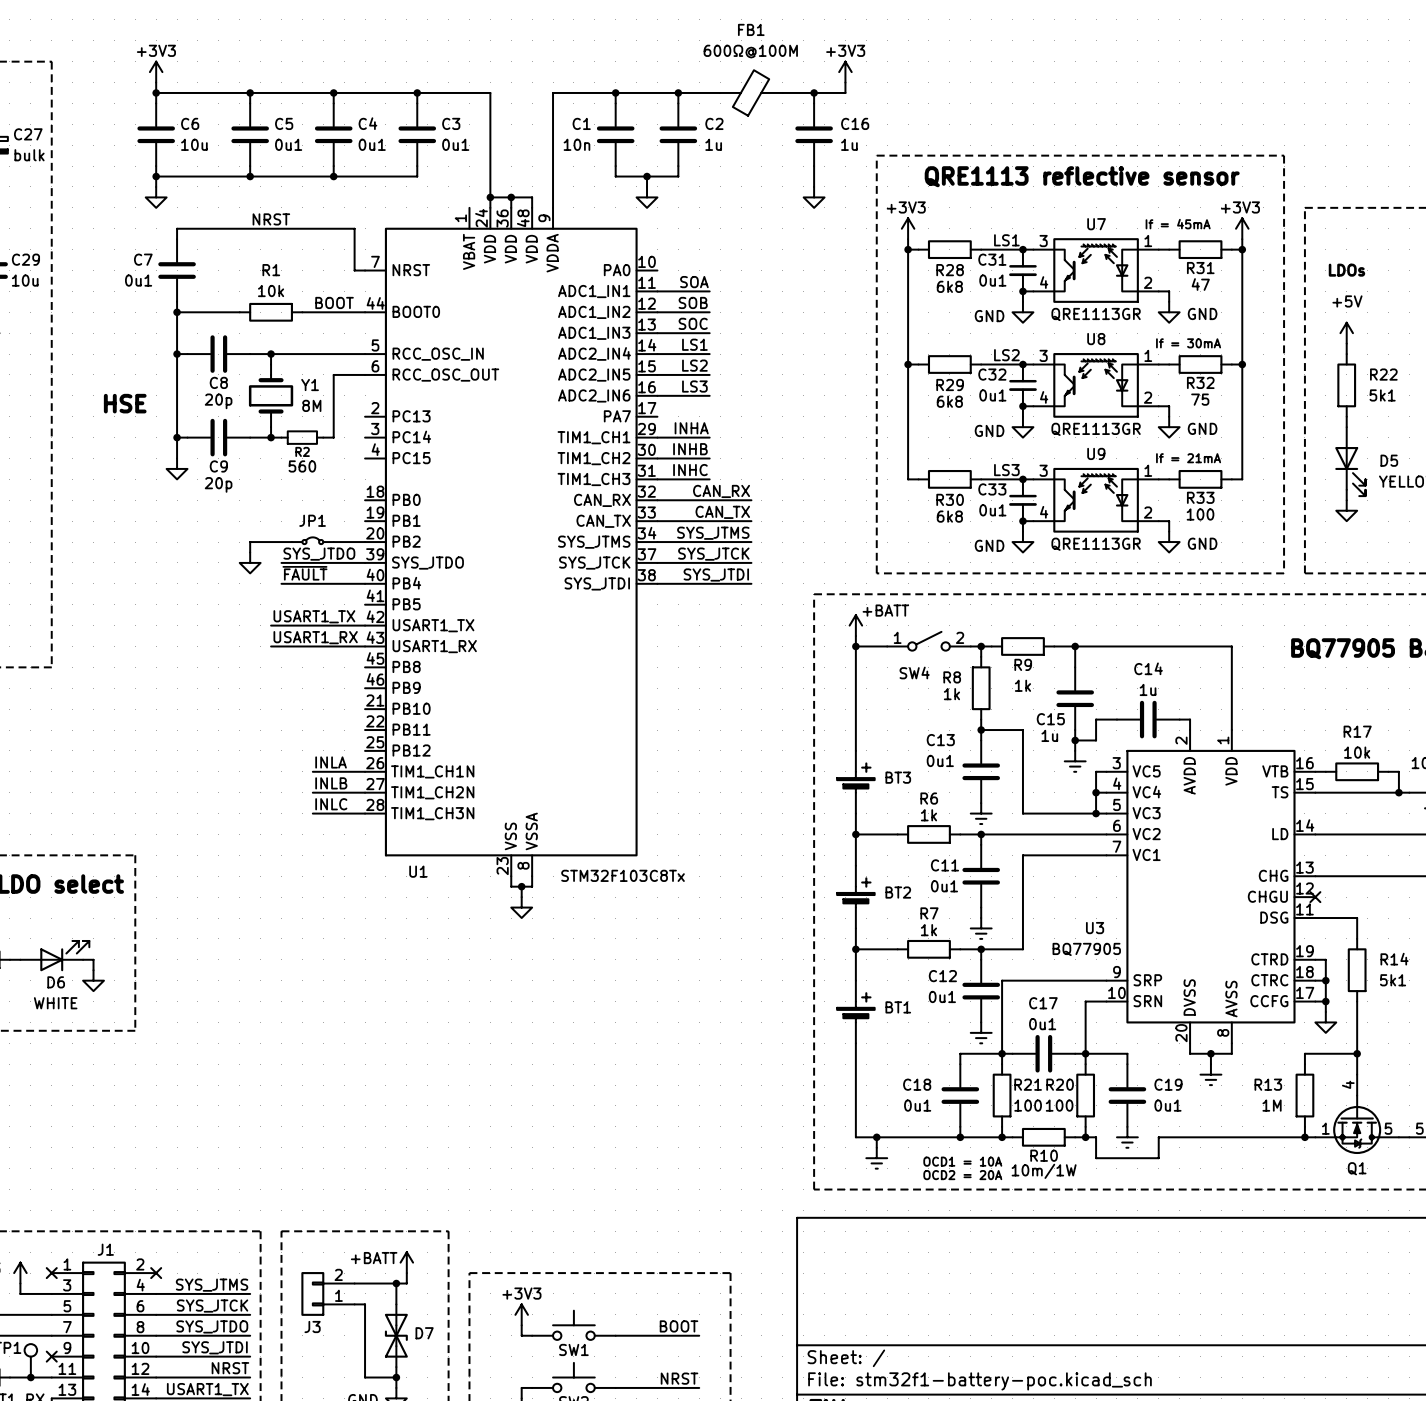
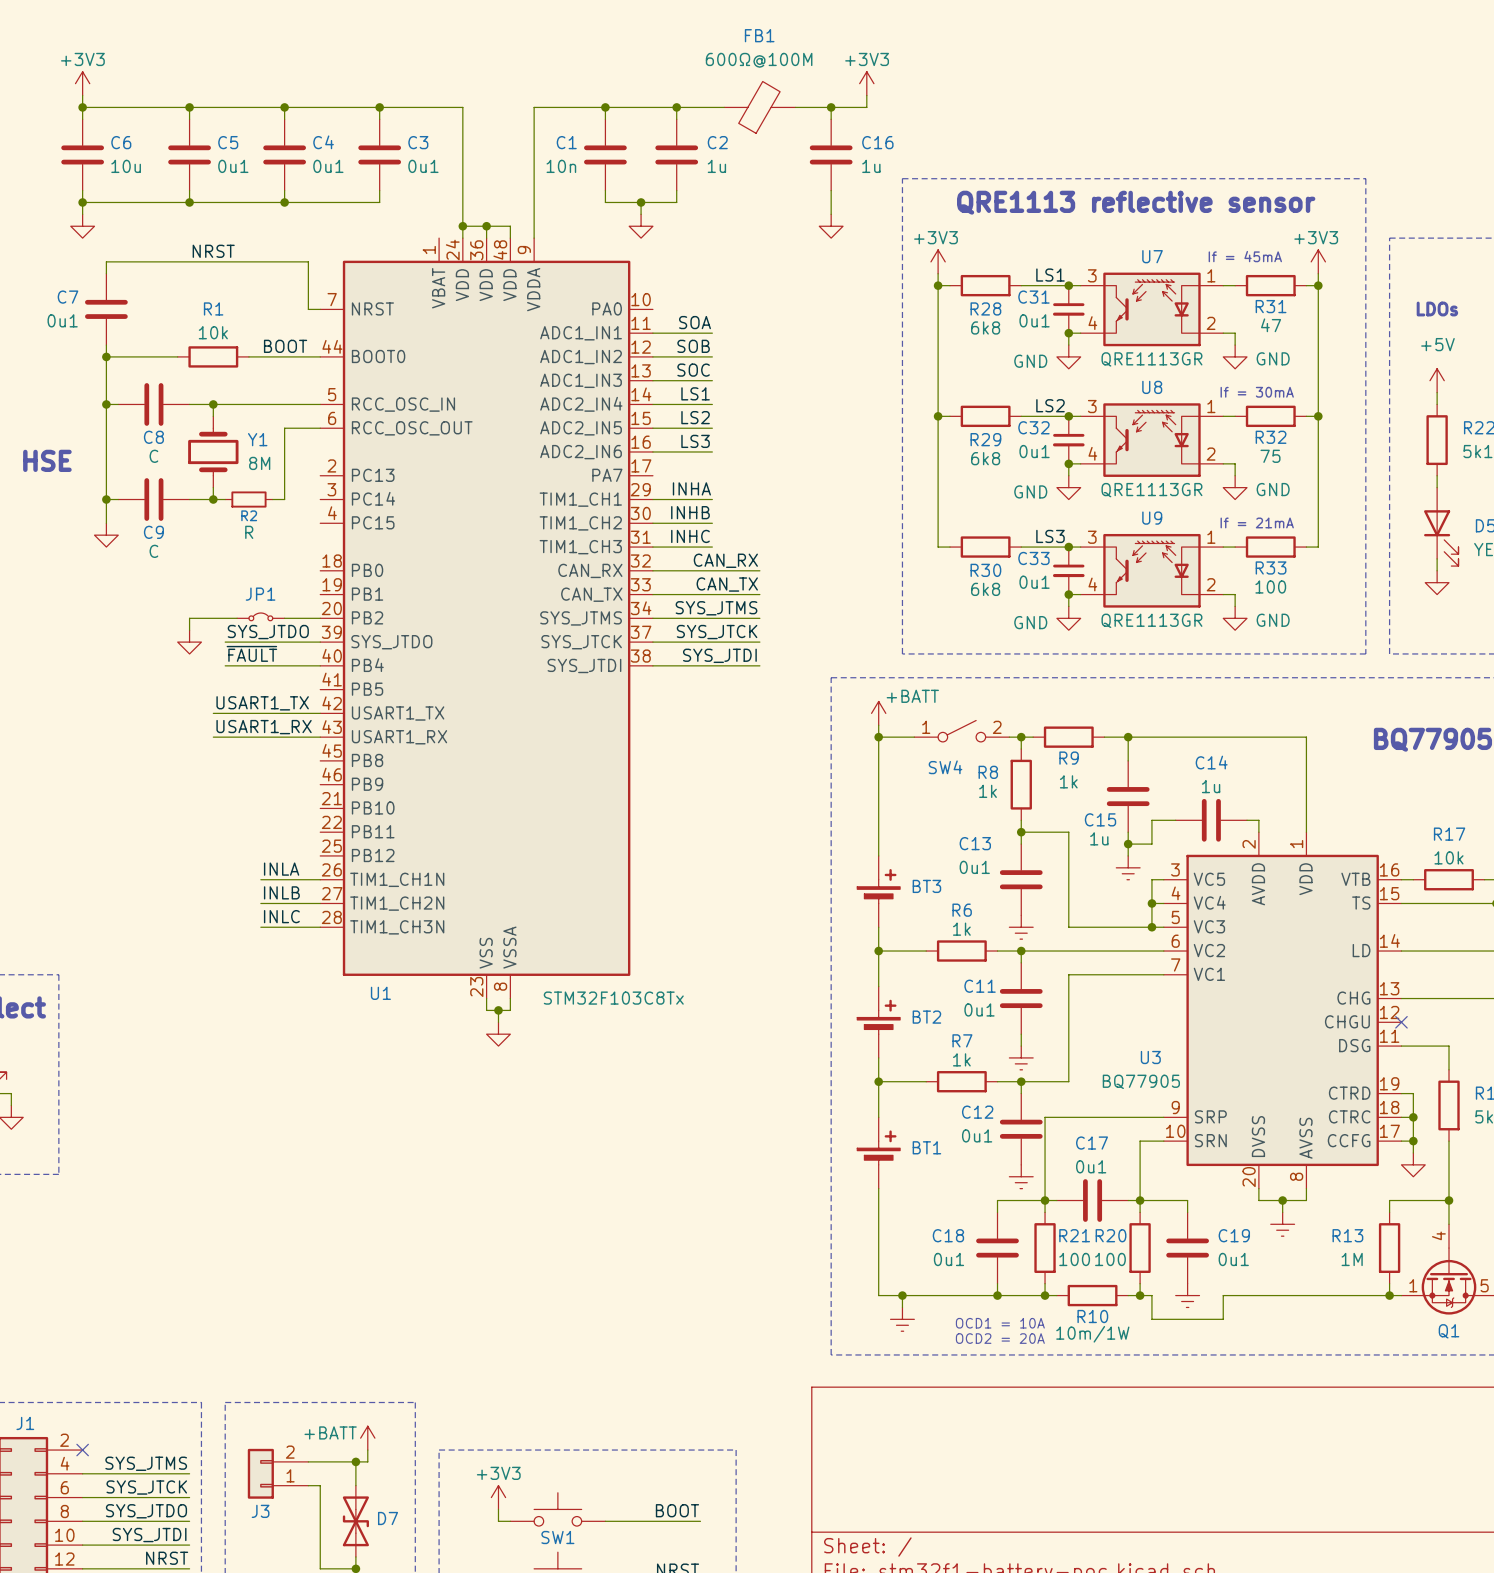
C8 value: 20p (218, 401) -> C (153, 456)
R2 value: 560 (302, 466) -> R (249, 532)
C9 value: 20p (218, 484) -> C (153, 551)

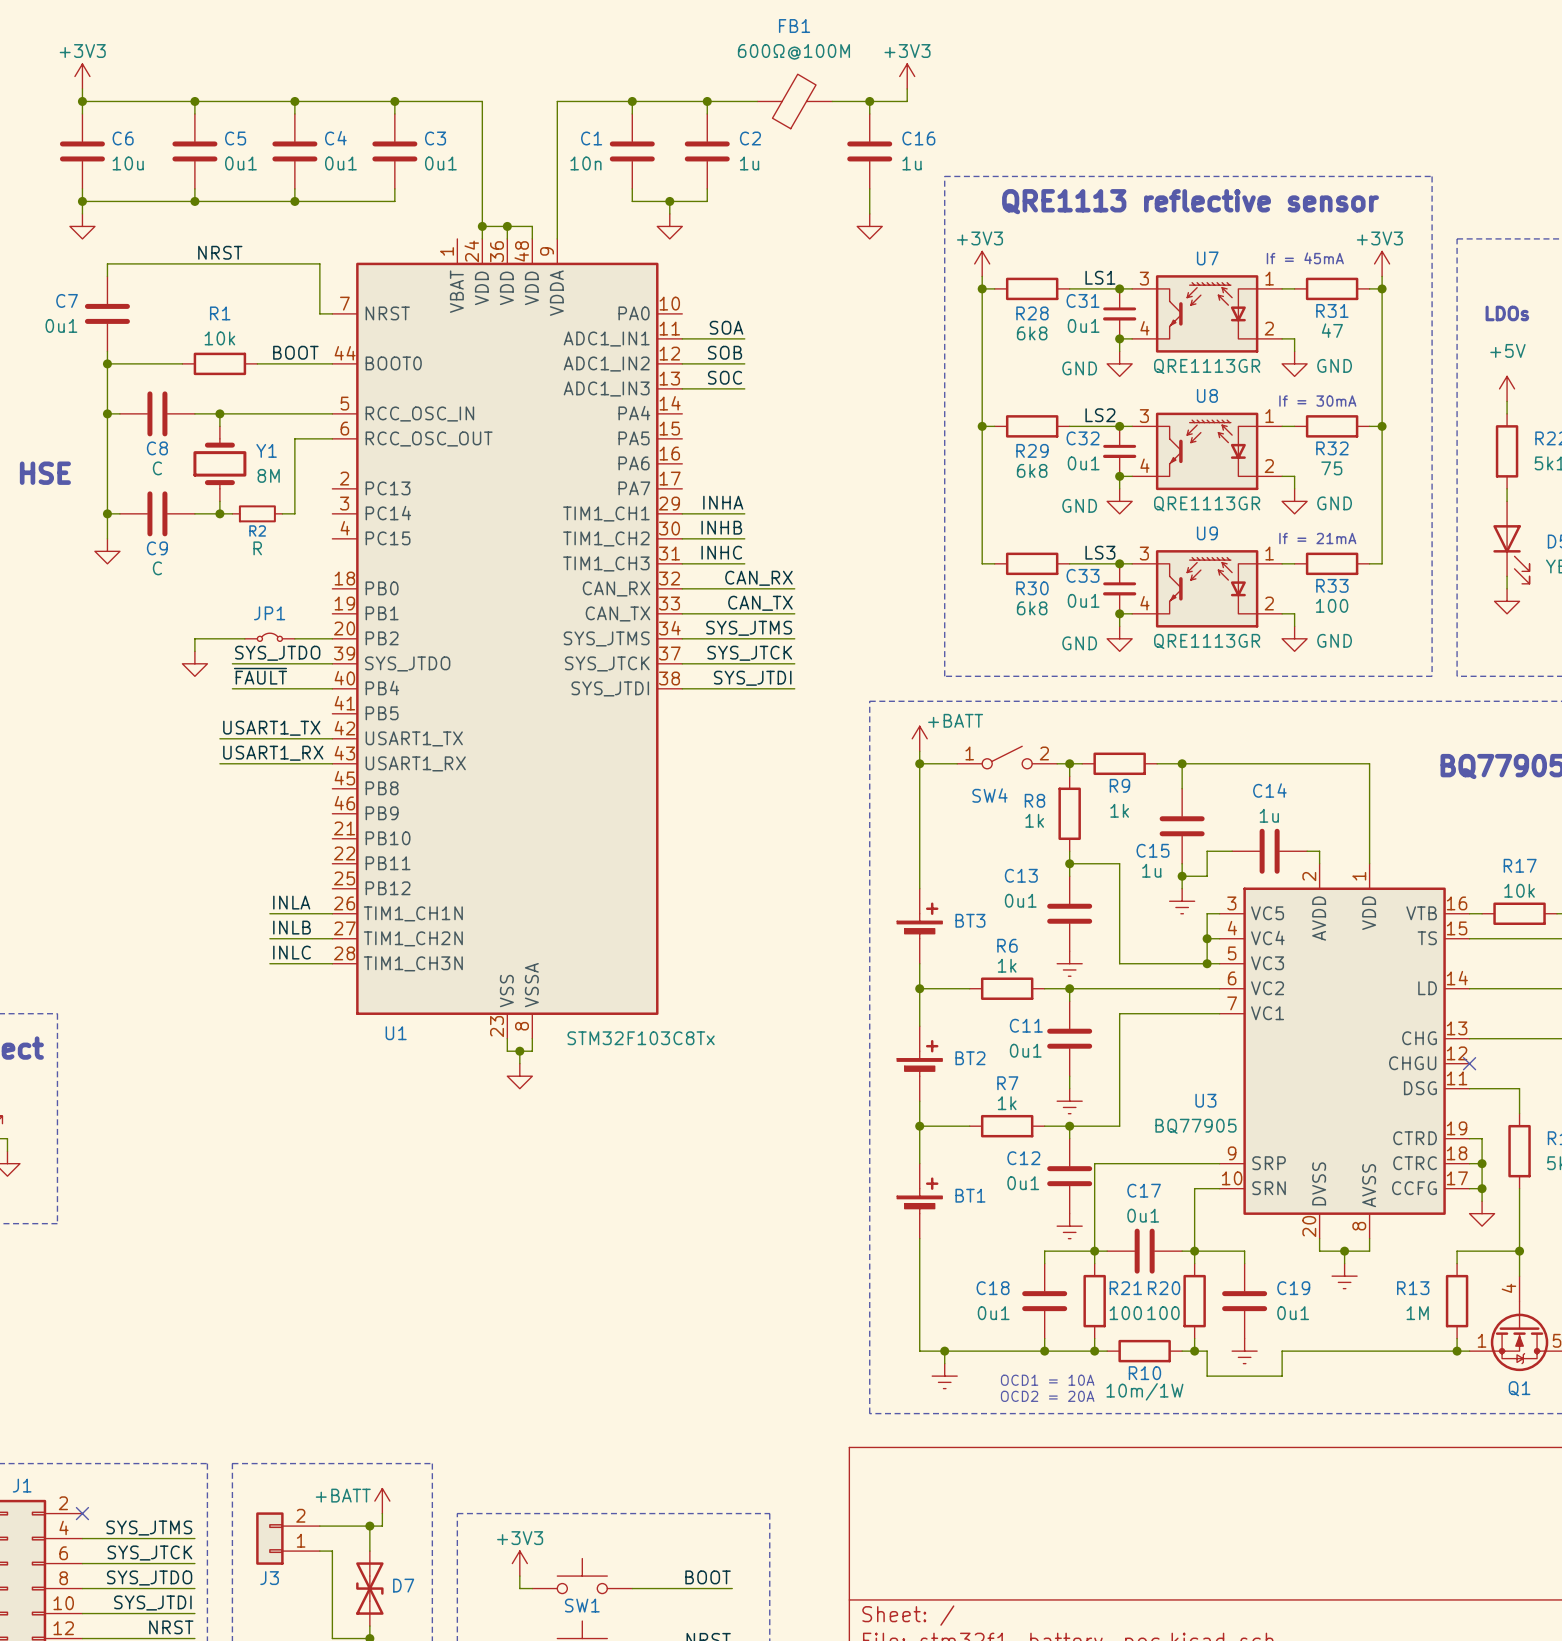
label: LS1 (695, 393) -> none
U1 pin name: ADC2_IN4 (581, 404) -> PA4 (634, 413)
wire: (652, 404) (712, 404) -> none
label: LS2 (695, 417) -> none
U1 pin name: ADC2_IN5 (581, 428) -> PA5 (634, 438)
wire: (652, 428) (712, 428) -> none
label: LS3 (695, 441) -> none
wire: (652, 451) (712, 451) -> none
U1 pin name: ADC2_IN6 (581, 452) -> PA6 (634, 463)

